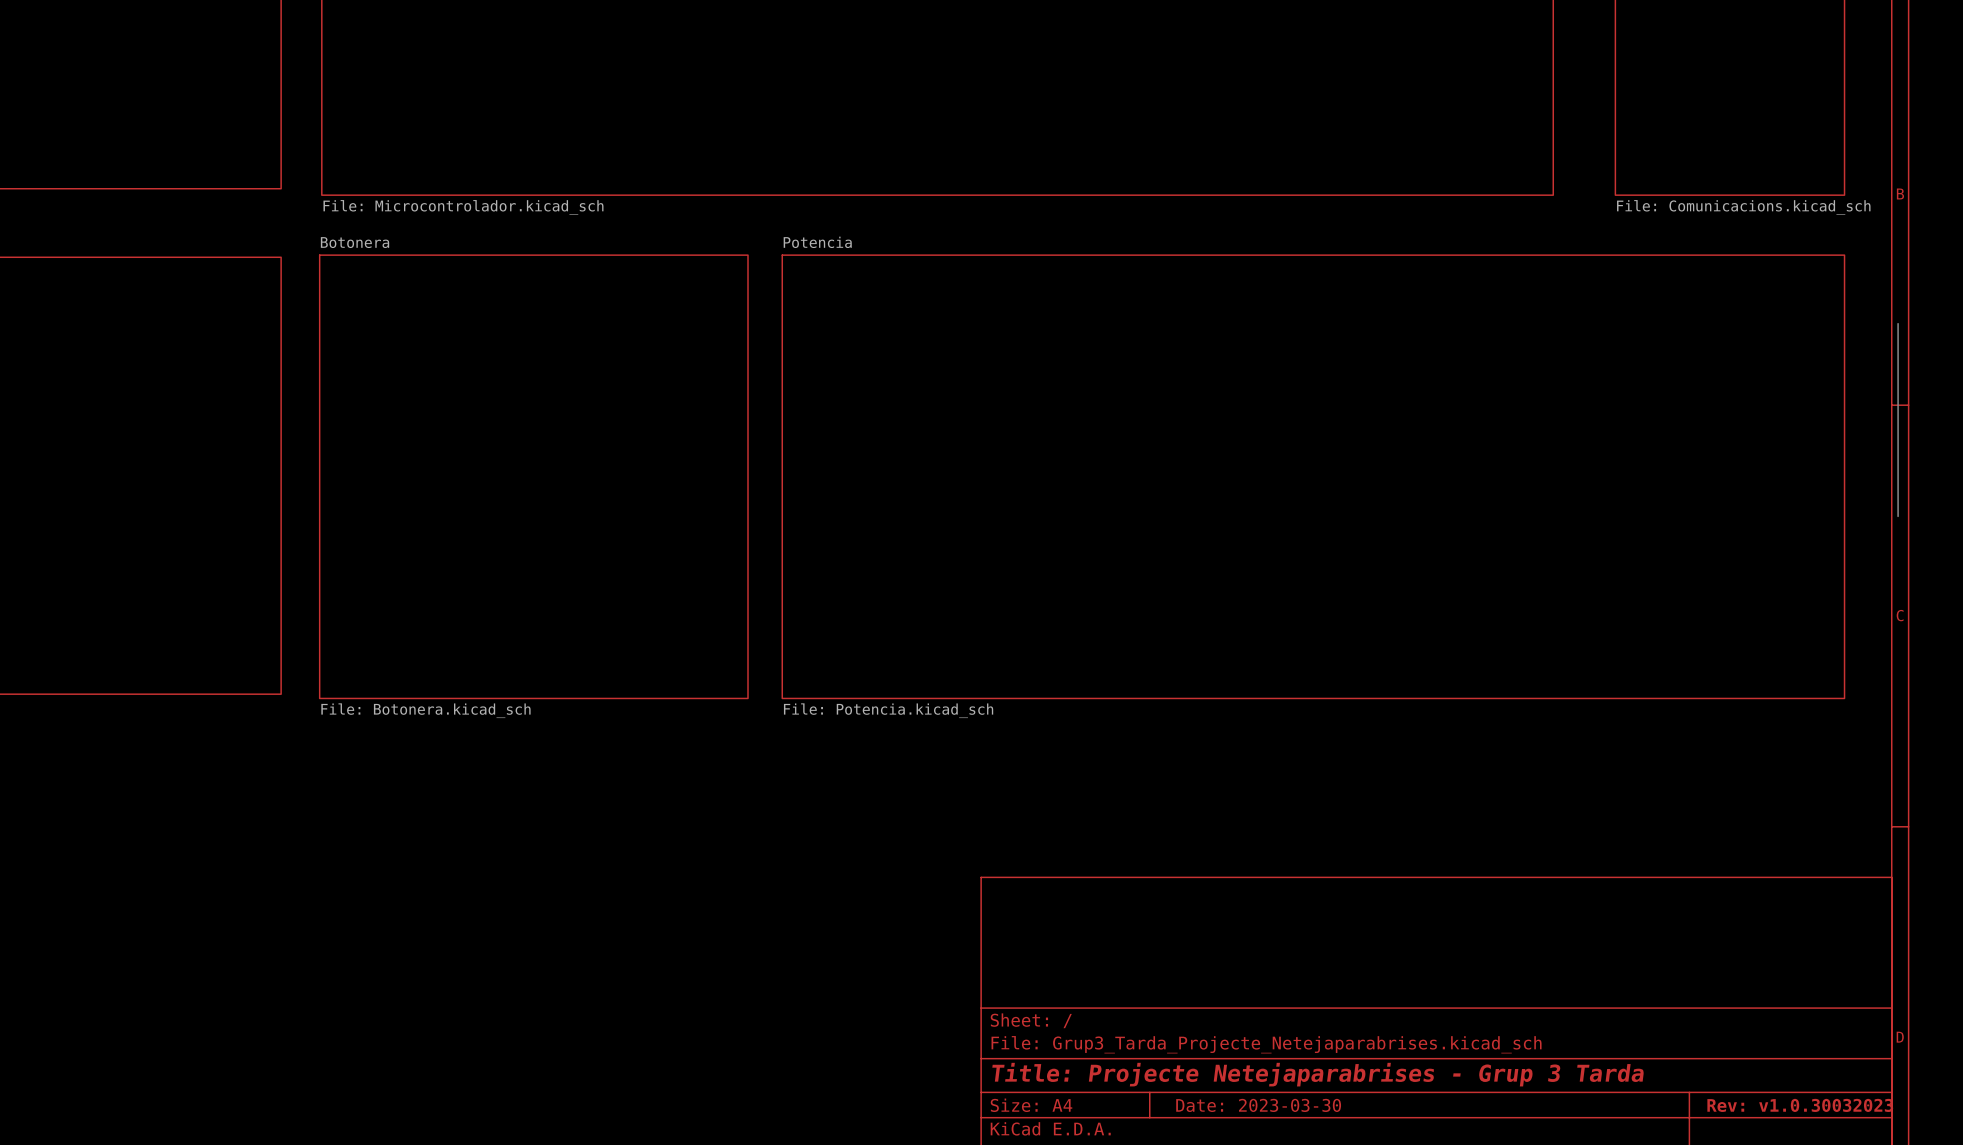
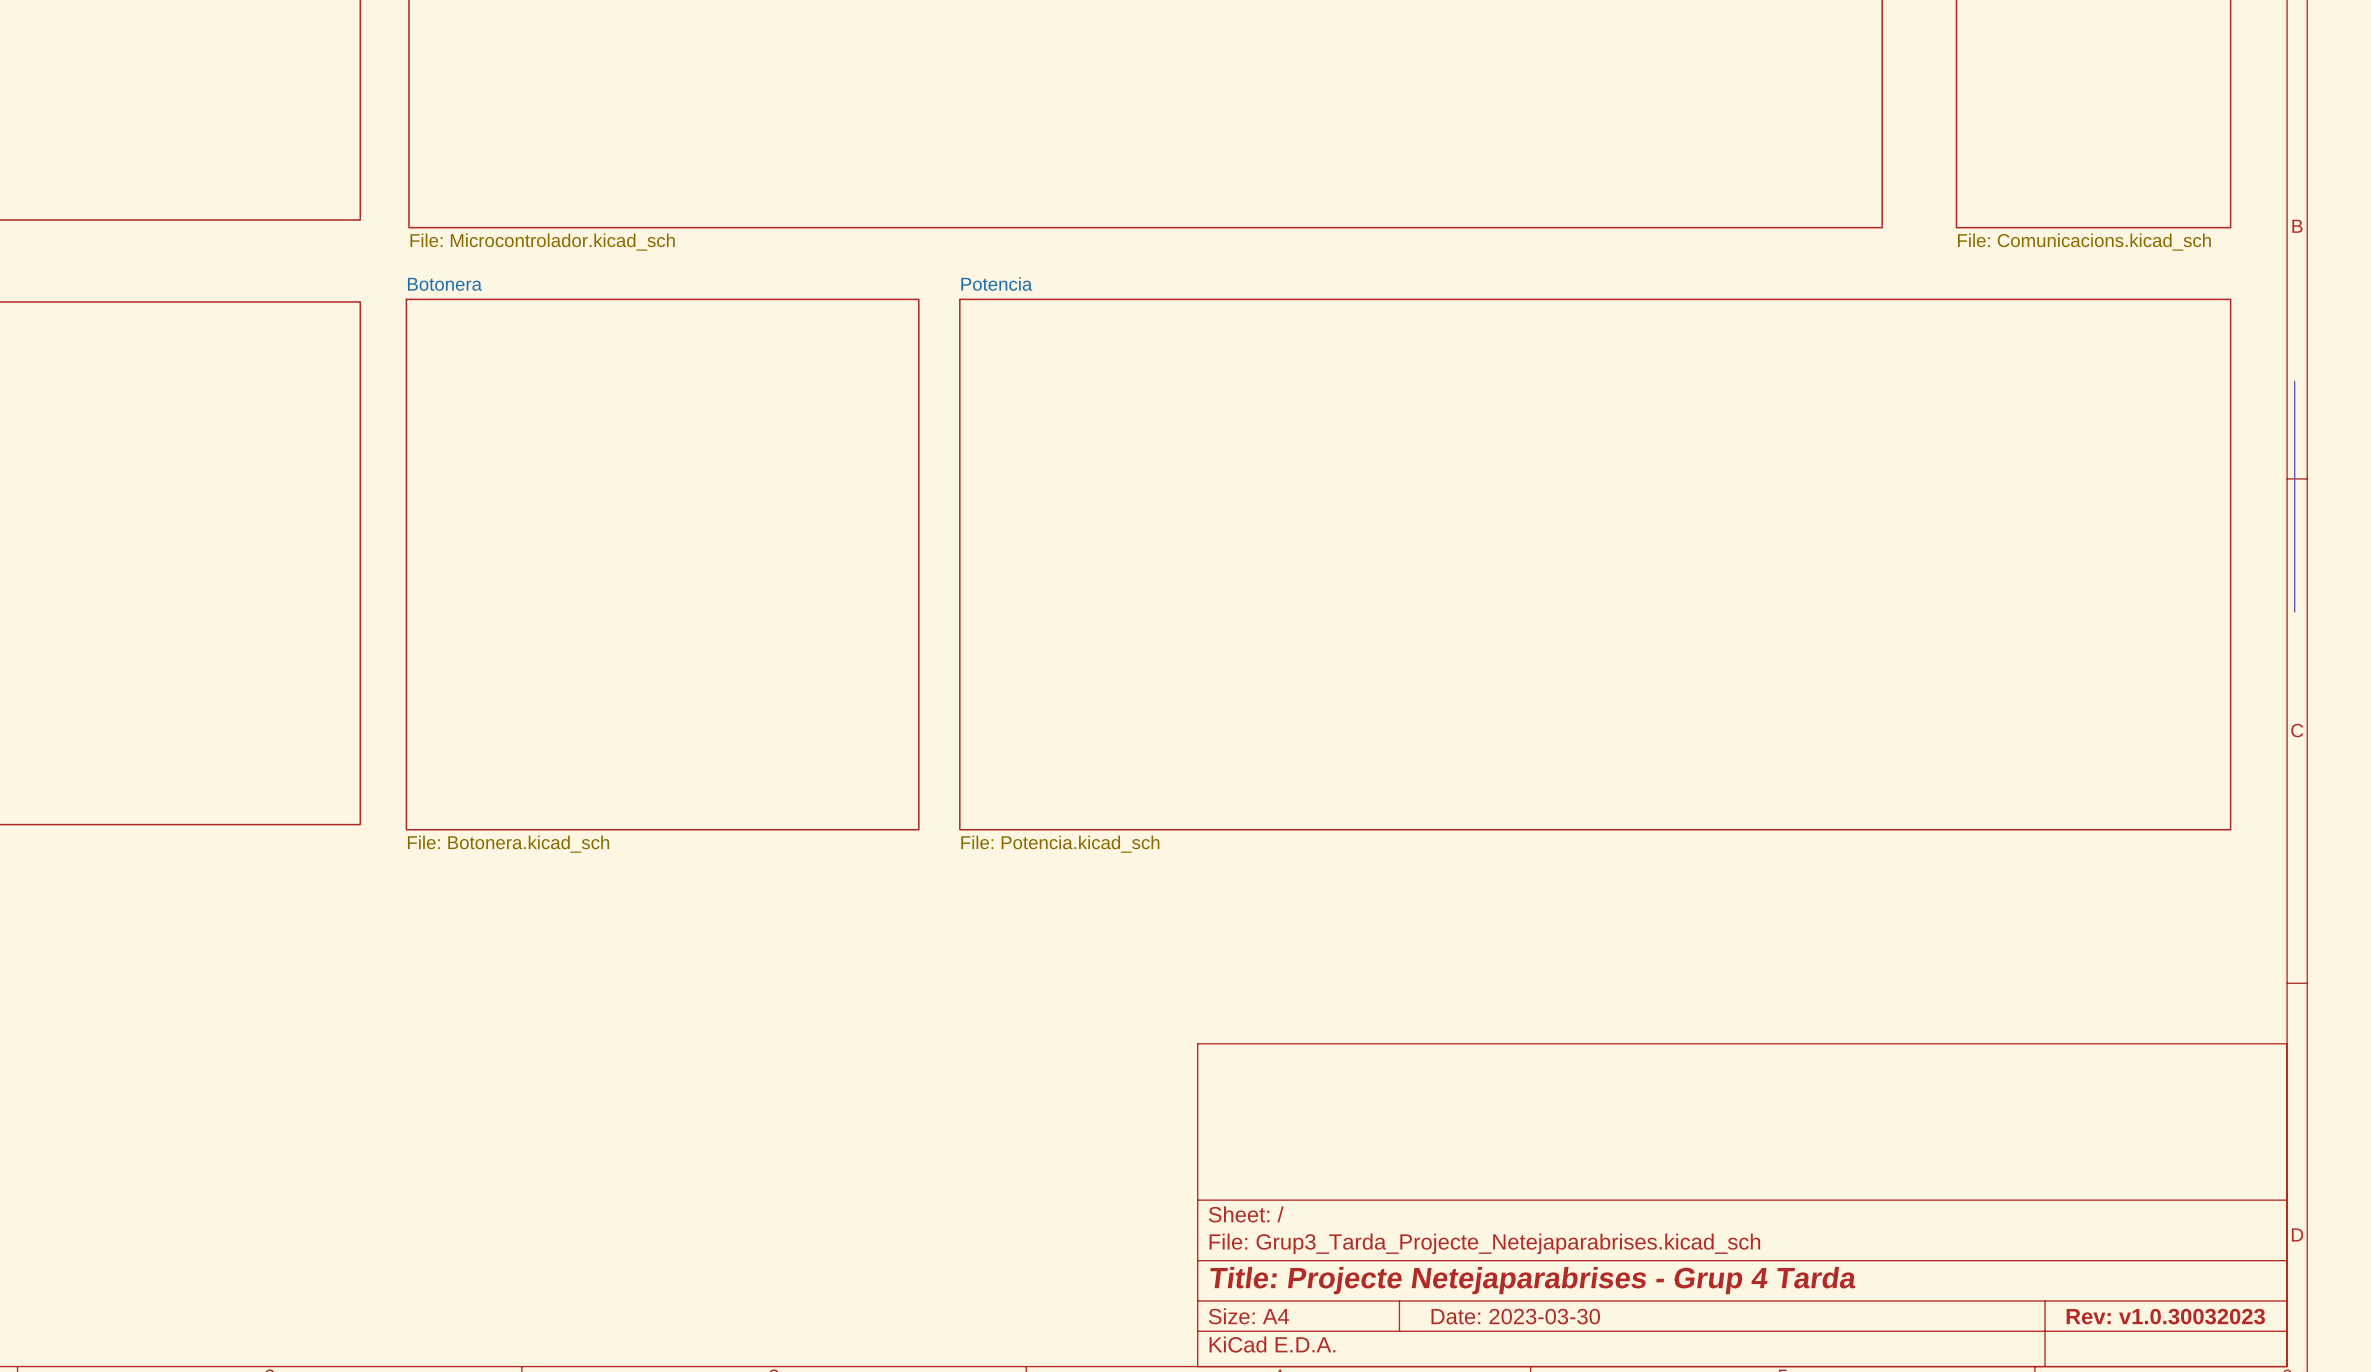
title block: Title: Projecte Netejaparabrises - Grup 3 Tarda (1318, 1074) -> Title: Projecte Netejaparabrises - Grup 4 Tarda (1532, 1280)

